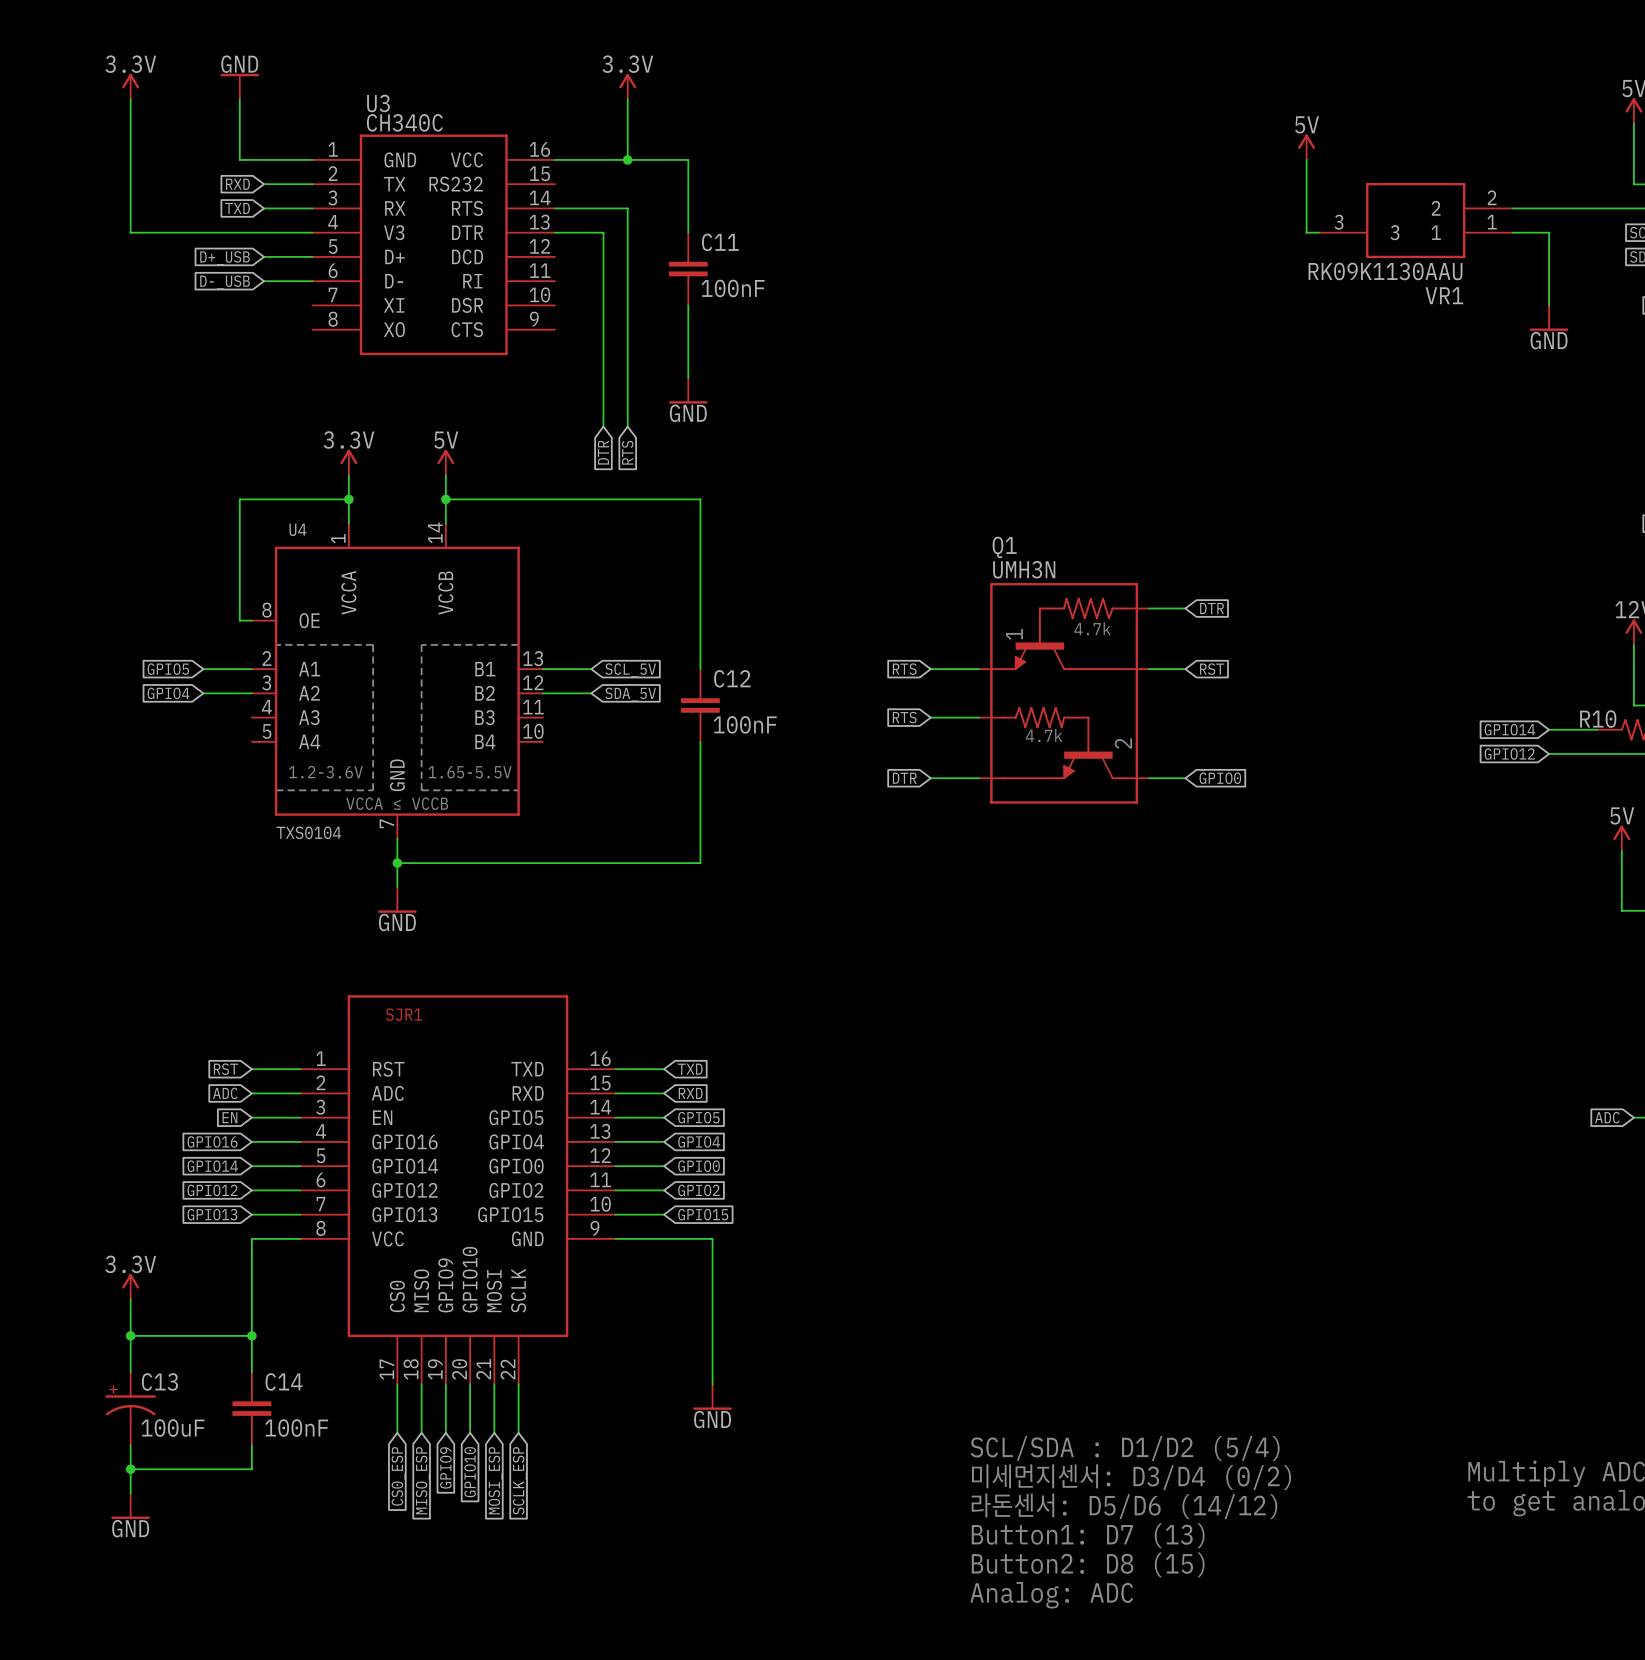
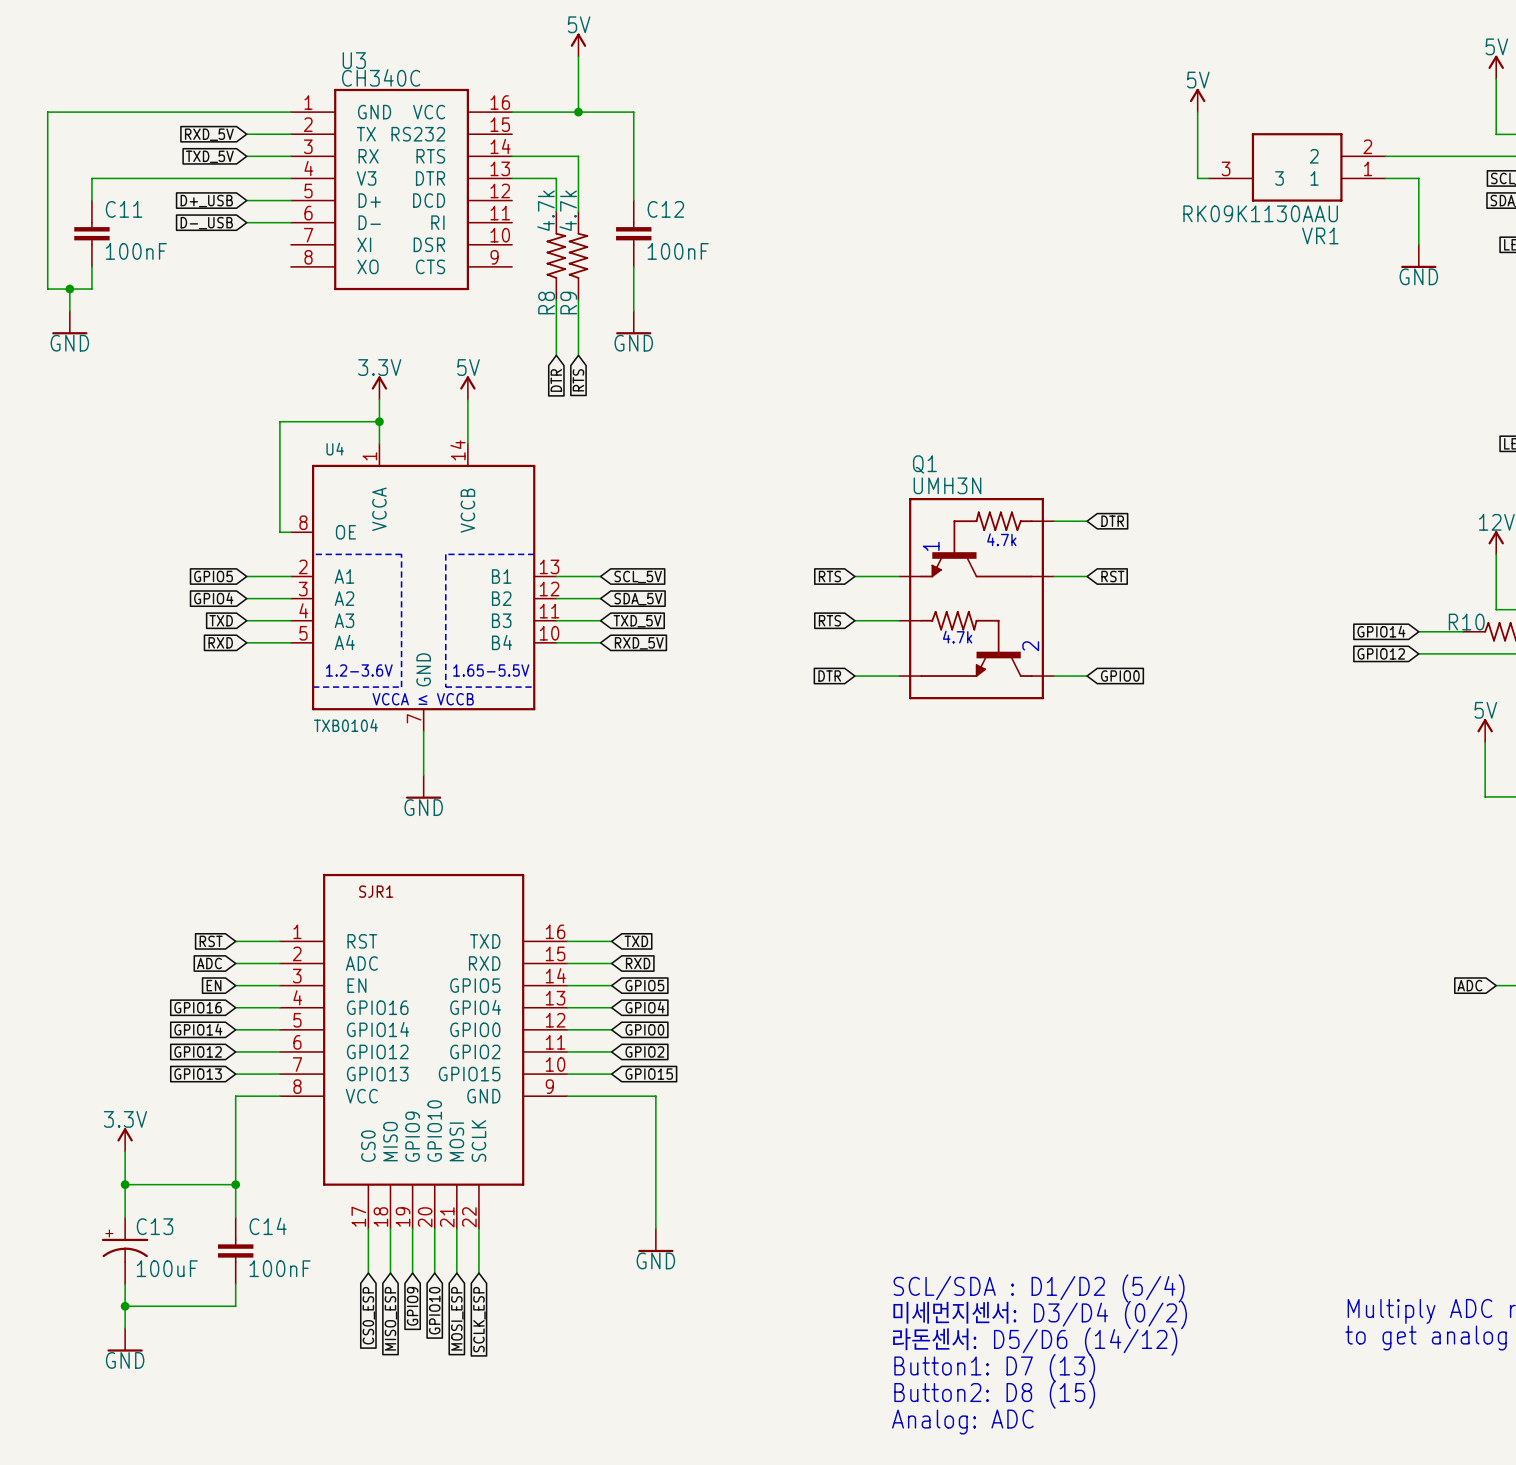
power symbol: 3.3V (130, 86) -> none
power symbol: GND (239, 86) -> none
power symbol: 3.3V (627, 86) -> 5V (578, 45)
wire: (130, 99) (130, 232) -> (91, 200) (91, 178) (125, 178)
wire: (239, 99) (239, 159) -> (91, 266) (91, 289) (47, 289) (47, 112) (224, 112)
global label: RXD (237, 184) -> RXD_5V (209, 134)
global label: TXD (237, 208) -> TXD_5V (209, 156)
C11 position: (688, 269) -> (91, 233)
R8: none -> 4.7k (556, 255)
R9: none -> 4.7k (578, 255)
wire: none -> (69, 289) (69, 311)
junction: none -> (69, 289)
power symbol: none -> GND (69, 322)
power symbol position: 3.3V (348, 462) -> 3.3V (379, 387)
power symbol position: 5V (445, 462) -> 5V (467, 387)
wire: (348, 475) (348, 523) -> (379, 399) (379, 443)
wire: (445, 475) (445, 523) -> (467, 399) (467, 443)
wire: (300, 499) (239, 499) (239, 620) (251, 620) -> (279, 421) (279, 532) (290, 532)
wire: none -> (324, 421) (379, 421)
junction: (348, 499) -> none
junction: none -> (379, 421)
wire: (445, 499) (700, 499) (700, 669) -> none
junction: (445, 499) -> none
global label position: GPIO5 (168, 669) -> GPIO5 (213, 576)
wire: (203, 669) (251, 669) -> (246, 576) (290, 576)
wire: (542, 669) (591, 669) -> (556, 576) (600, 576)
global label position: SCL_5V (630, 670) -> SCL_5V (638, 576)
U4 position: (397, 681) -> (423, 587)
global label position: GPIO4 (168, 693) -> GPIO4 (213, 598)
wire: (203, 693) (251, 693) -> (246, 598) (290, 598)
wire: (542, 693) (591, 693) -> (556, 598) (600, 598)
global label position: SDA_5V (630, 694) -> SDA_5V (638, 599)
C12 position: (700, 705) -> (633, 233)
global label: none -> TXD (221, 620)
wire: none -> (246, 620) (290, 620)
wire: none -> (556, 620) (600, 620)
global label: none -> TXD_5V (637, 621)
global label: none -> RXD (220, 642)
wire: none -> (246, 642) (290, 642)
wire: none -> (556, 642) (600, 642)
wire: (700, 741) (700, 863) (397, 863) -> none
global label: none -> RXD_5V (639, 643)
U4 value: TXS0104 (308, 832) -> TXB0104 (345, 725)
wire: (397, 838) (397, 887) -> (423, 731) (423, 775)
junction: (397, 863) -> none
power symbol position: GND (397, 900) -> GND (423, 787)

